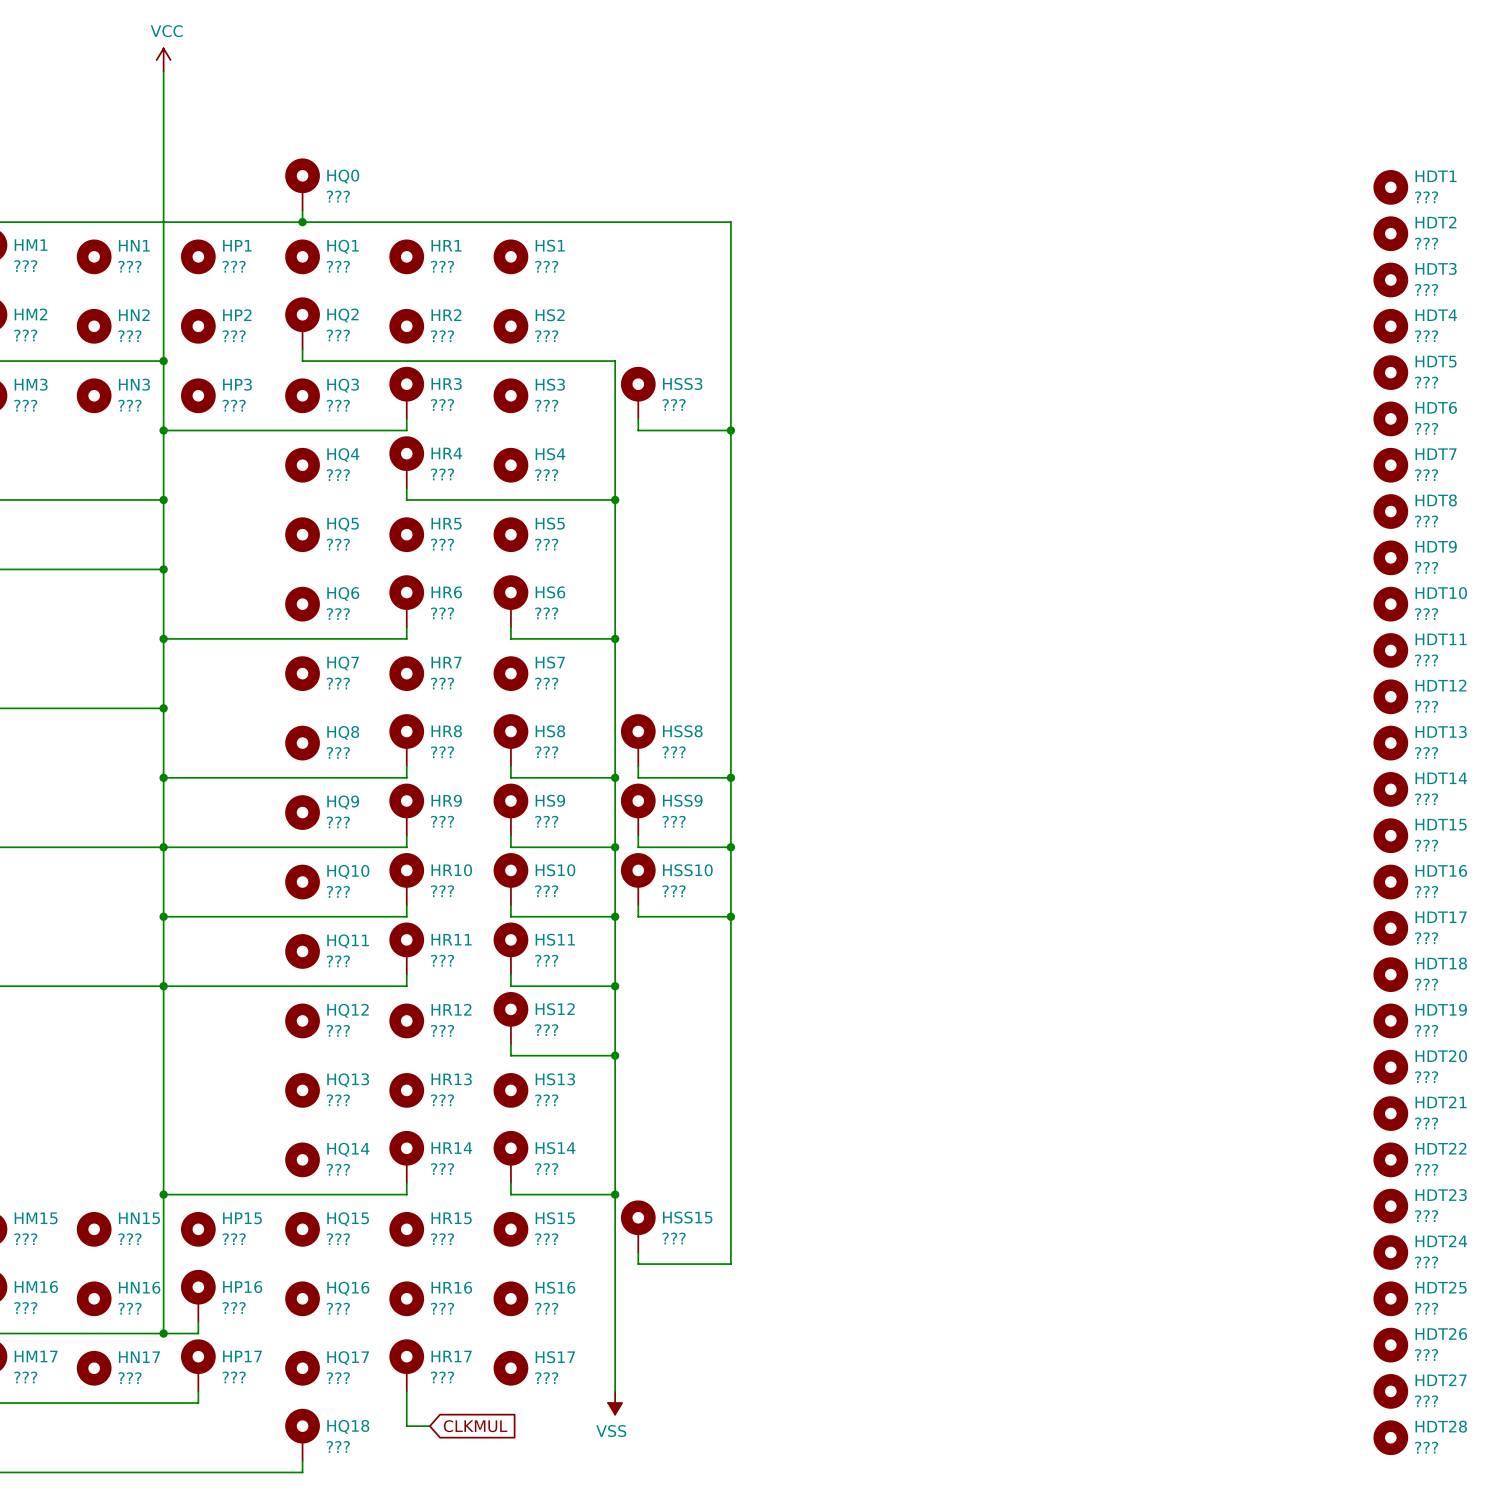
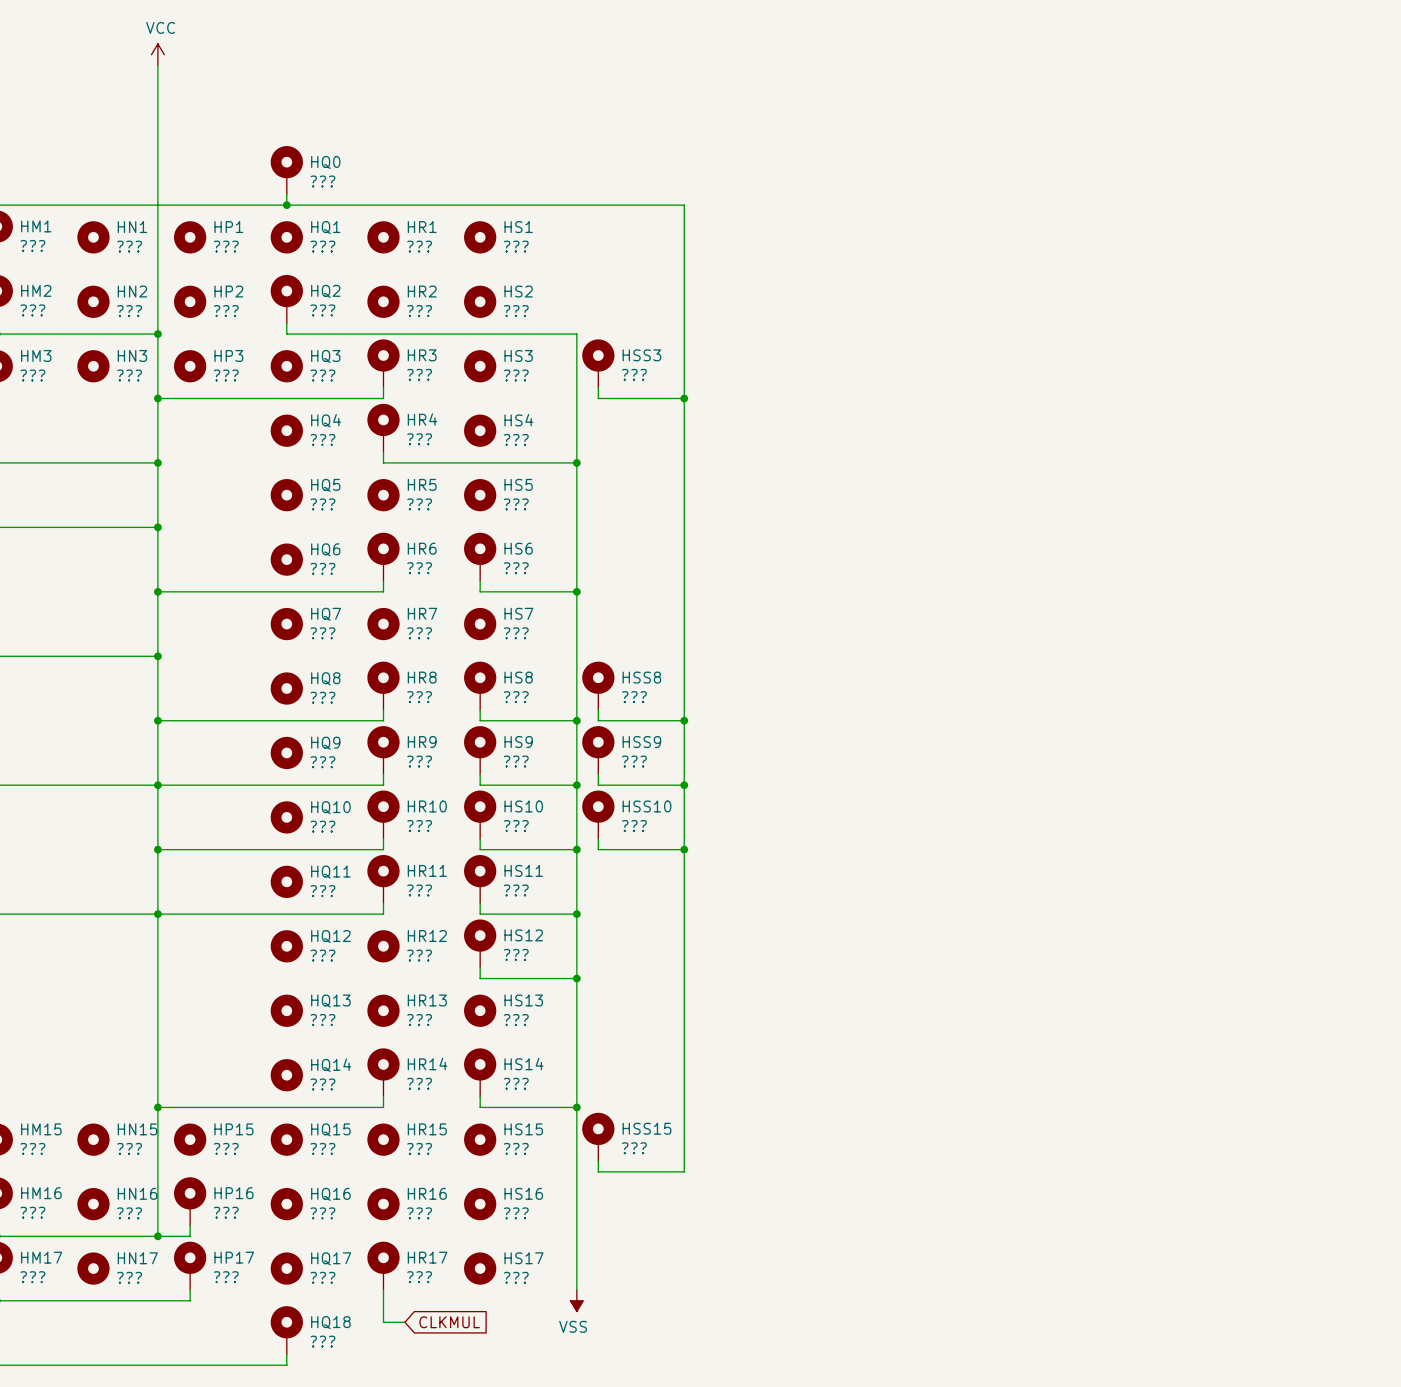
HDT1: ??? (1390, 187) -> none
HDT2: ??? (1390, 233) -> none
HDT3: ??? (1390, 280) -> none
HDT4: ??? (1390, 326) -> none
HDT5: ??? (1390, 372) -> none
HDT6: ??? (1390, 418) -> none
HDT7: ??? (1390, 465) -> none
HDT8: ??? (1390, 511) -> none
HDT9: ??? (1390, 557) -> none
HDT10: ??? (1390, 604) -> none
HDT11: ??? (1390, 650) -> none
HDT12: ??? (1390, 696) -> none
HDT13: ??? (1390, 743) -> none
HDT14: ??? (1390, 789) -> none
HDT15: ??? (1390, 835) -> none
HDT16: ??? (1390, 882) -> none
HDT17: ??? (1390, 928) -> none
HDT18: ??? (1390, 974) -> none
HDT19: ??? (1390, 1020) -> none
HDT20: ??? (1390, 1067) -> none
HDT21: ??? (1390, 1113) -> none
HDT22: ??? (1390, 1159) -> none
HDT23: ??? (1390, 1206) -> none
HDT24: ??? (1390, 1252) -> none
HDT25: ??? (1390, 1298) -> none
HDT26: ??? (1390, 1345) -> none
HDT27: ??? (1390, 1391) -> none
HDT28: ??? (1390, 1437) -> none

